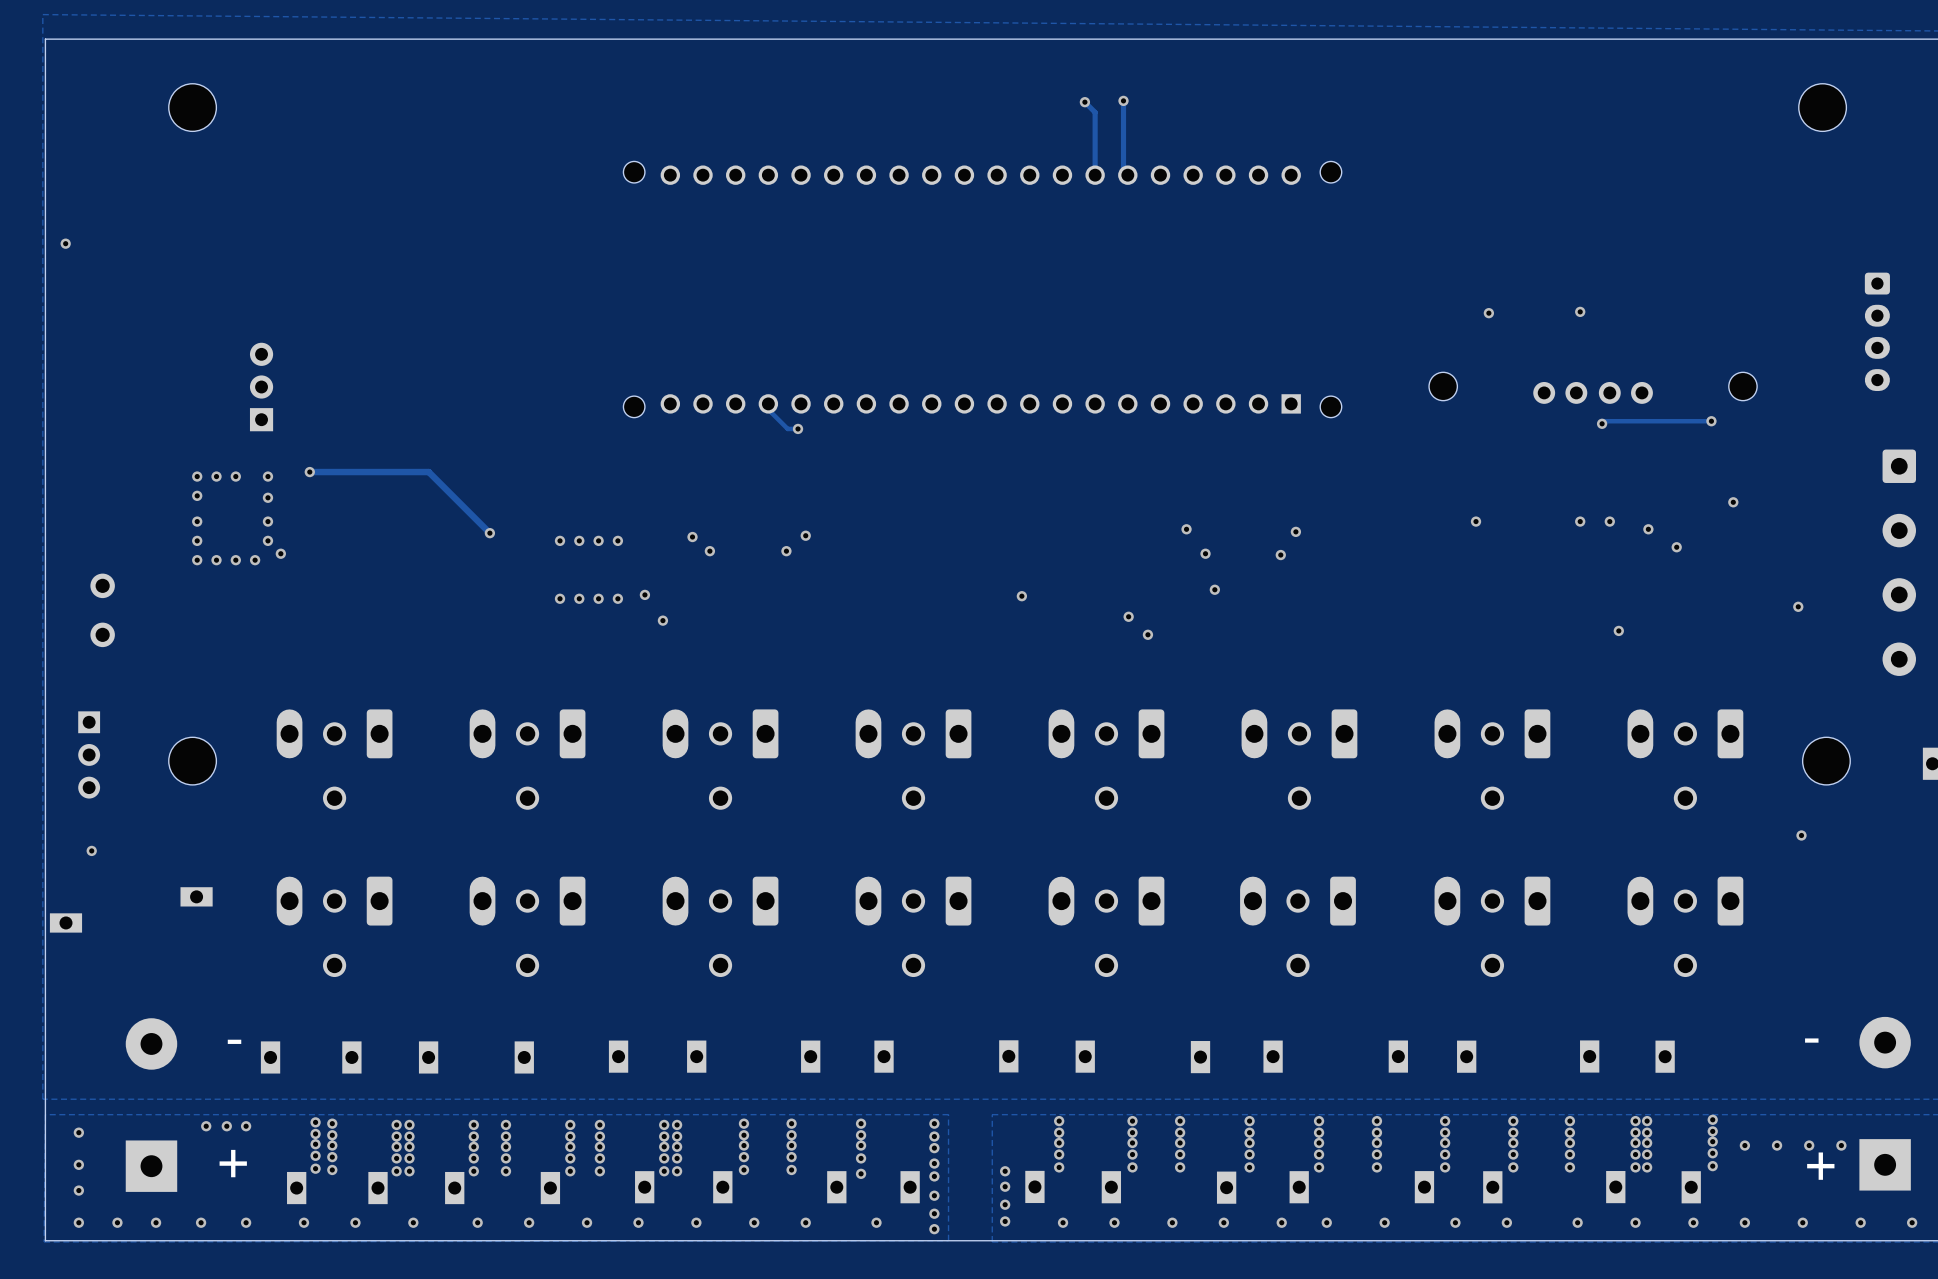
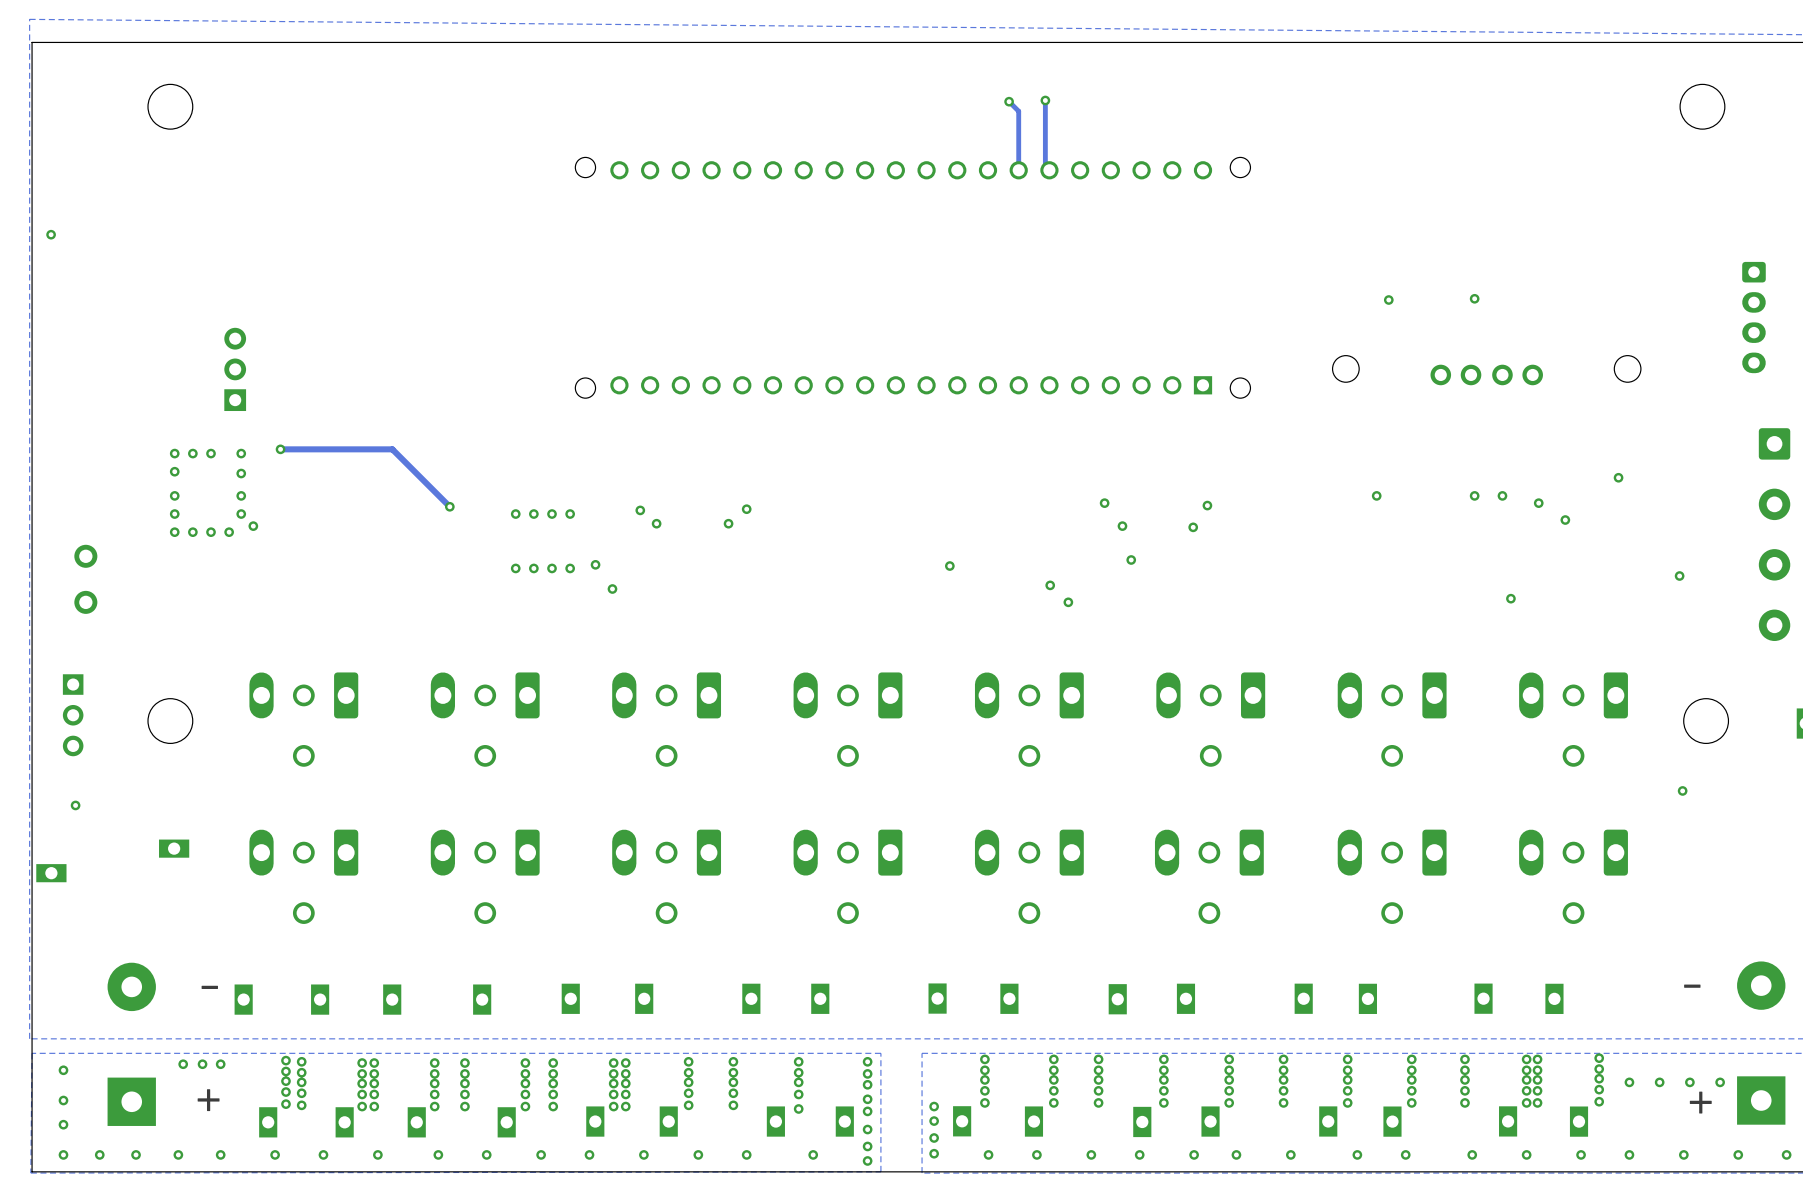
track: (768, 403) (771, 406) (771, 412) (787, 428) (798, 428) -> none
track: (1711, 421) (1604, 421) (1602, 423) -> none
via: (1711, 421) -> none
via: (1602, 423) -> none
via: (798, 428) -> none

